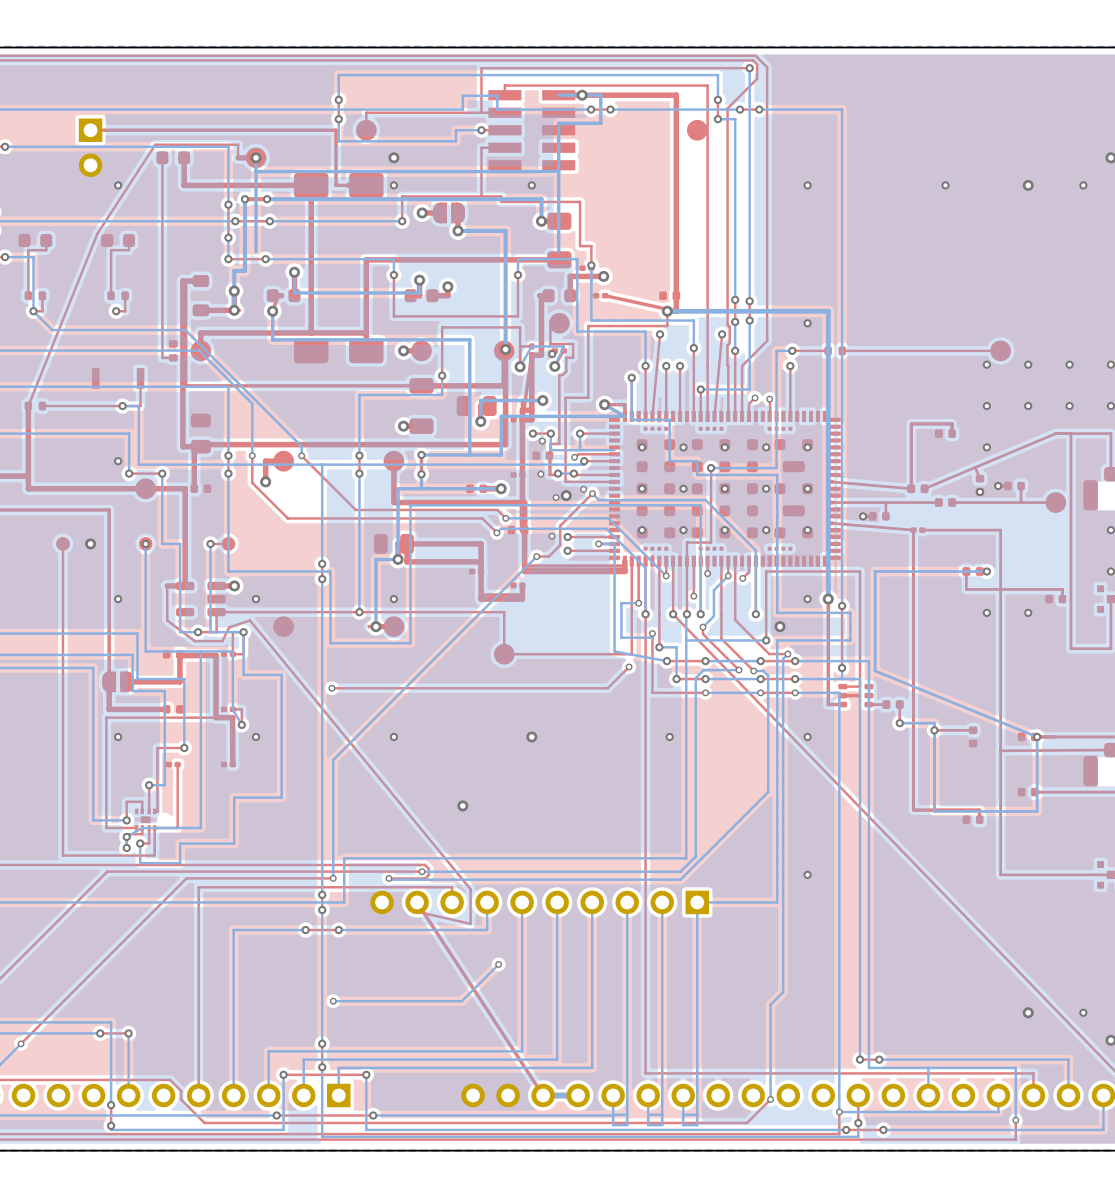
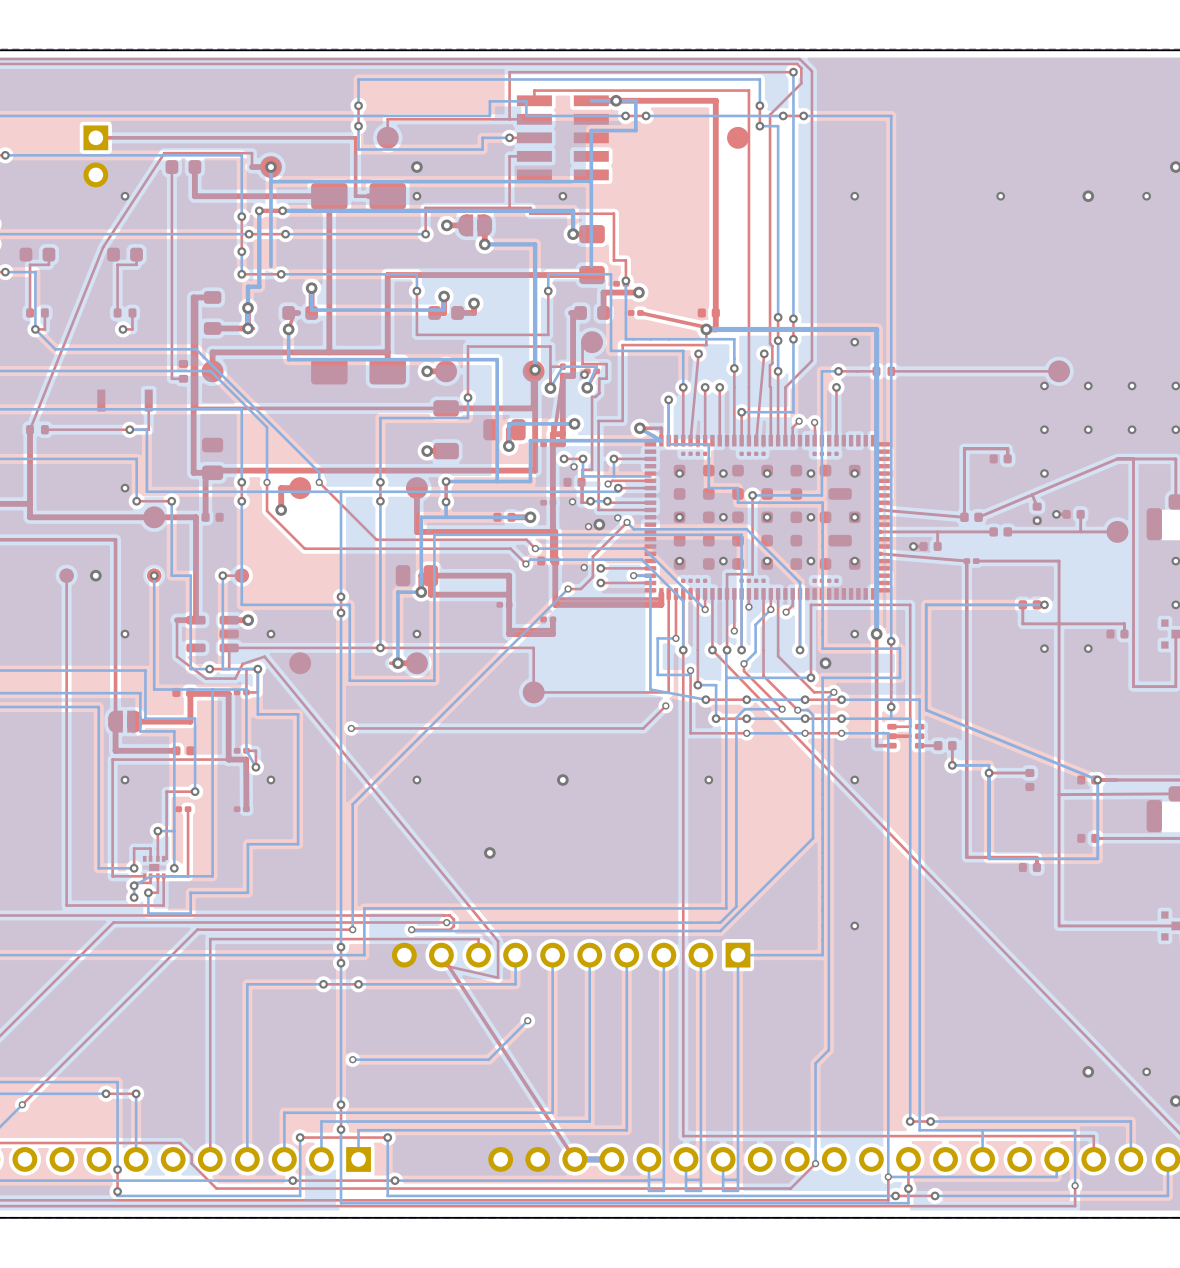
bottom track: none -> (174, 831) (174, 868)
via: none -> (174, 868)

